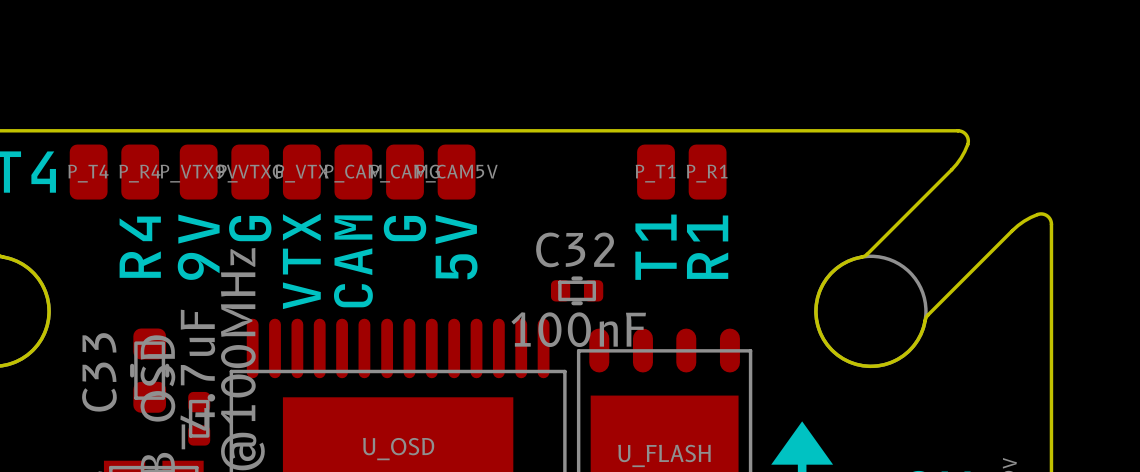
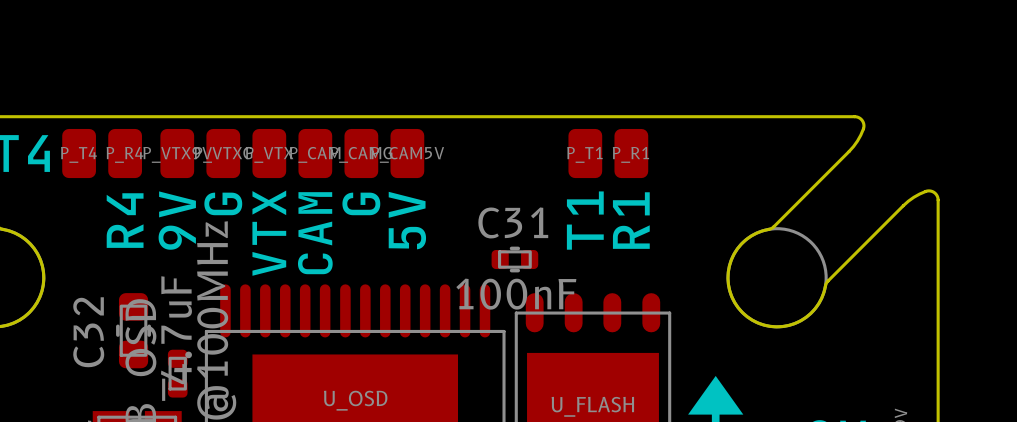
C32 name: C32 (575, 249) -> C31 (513, 222)
C33 name: C33 (99, 372) -> C32 (88, 332)

